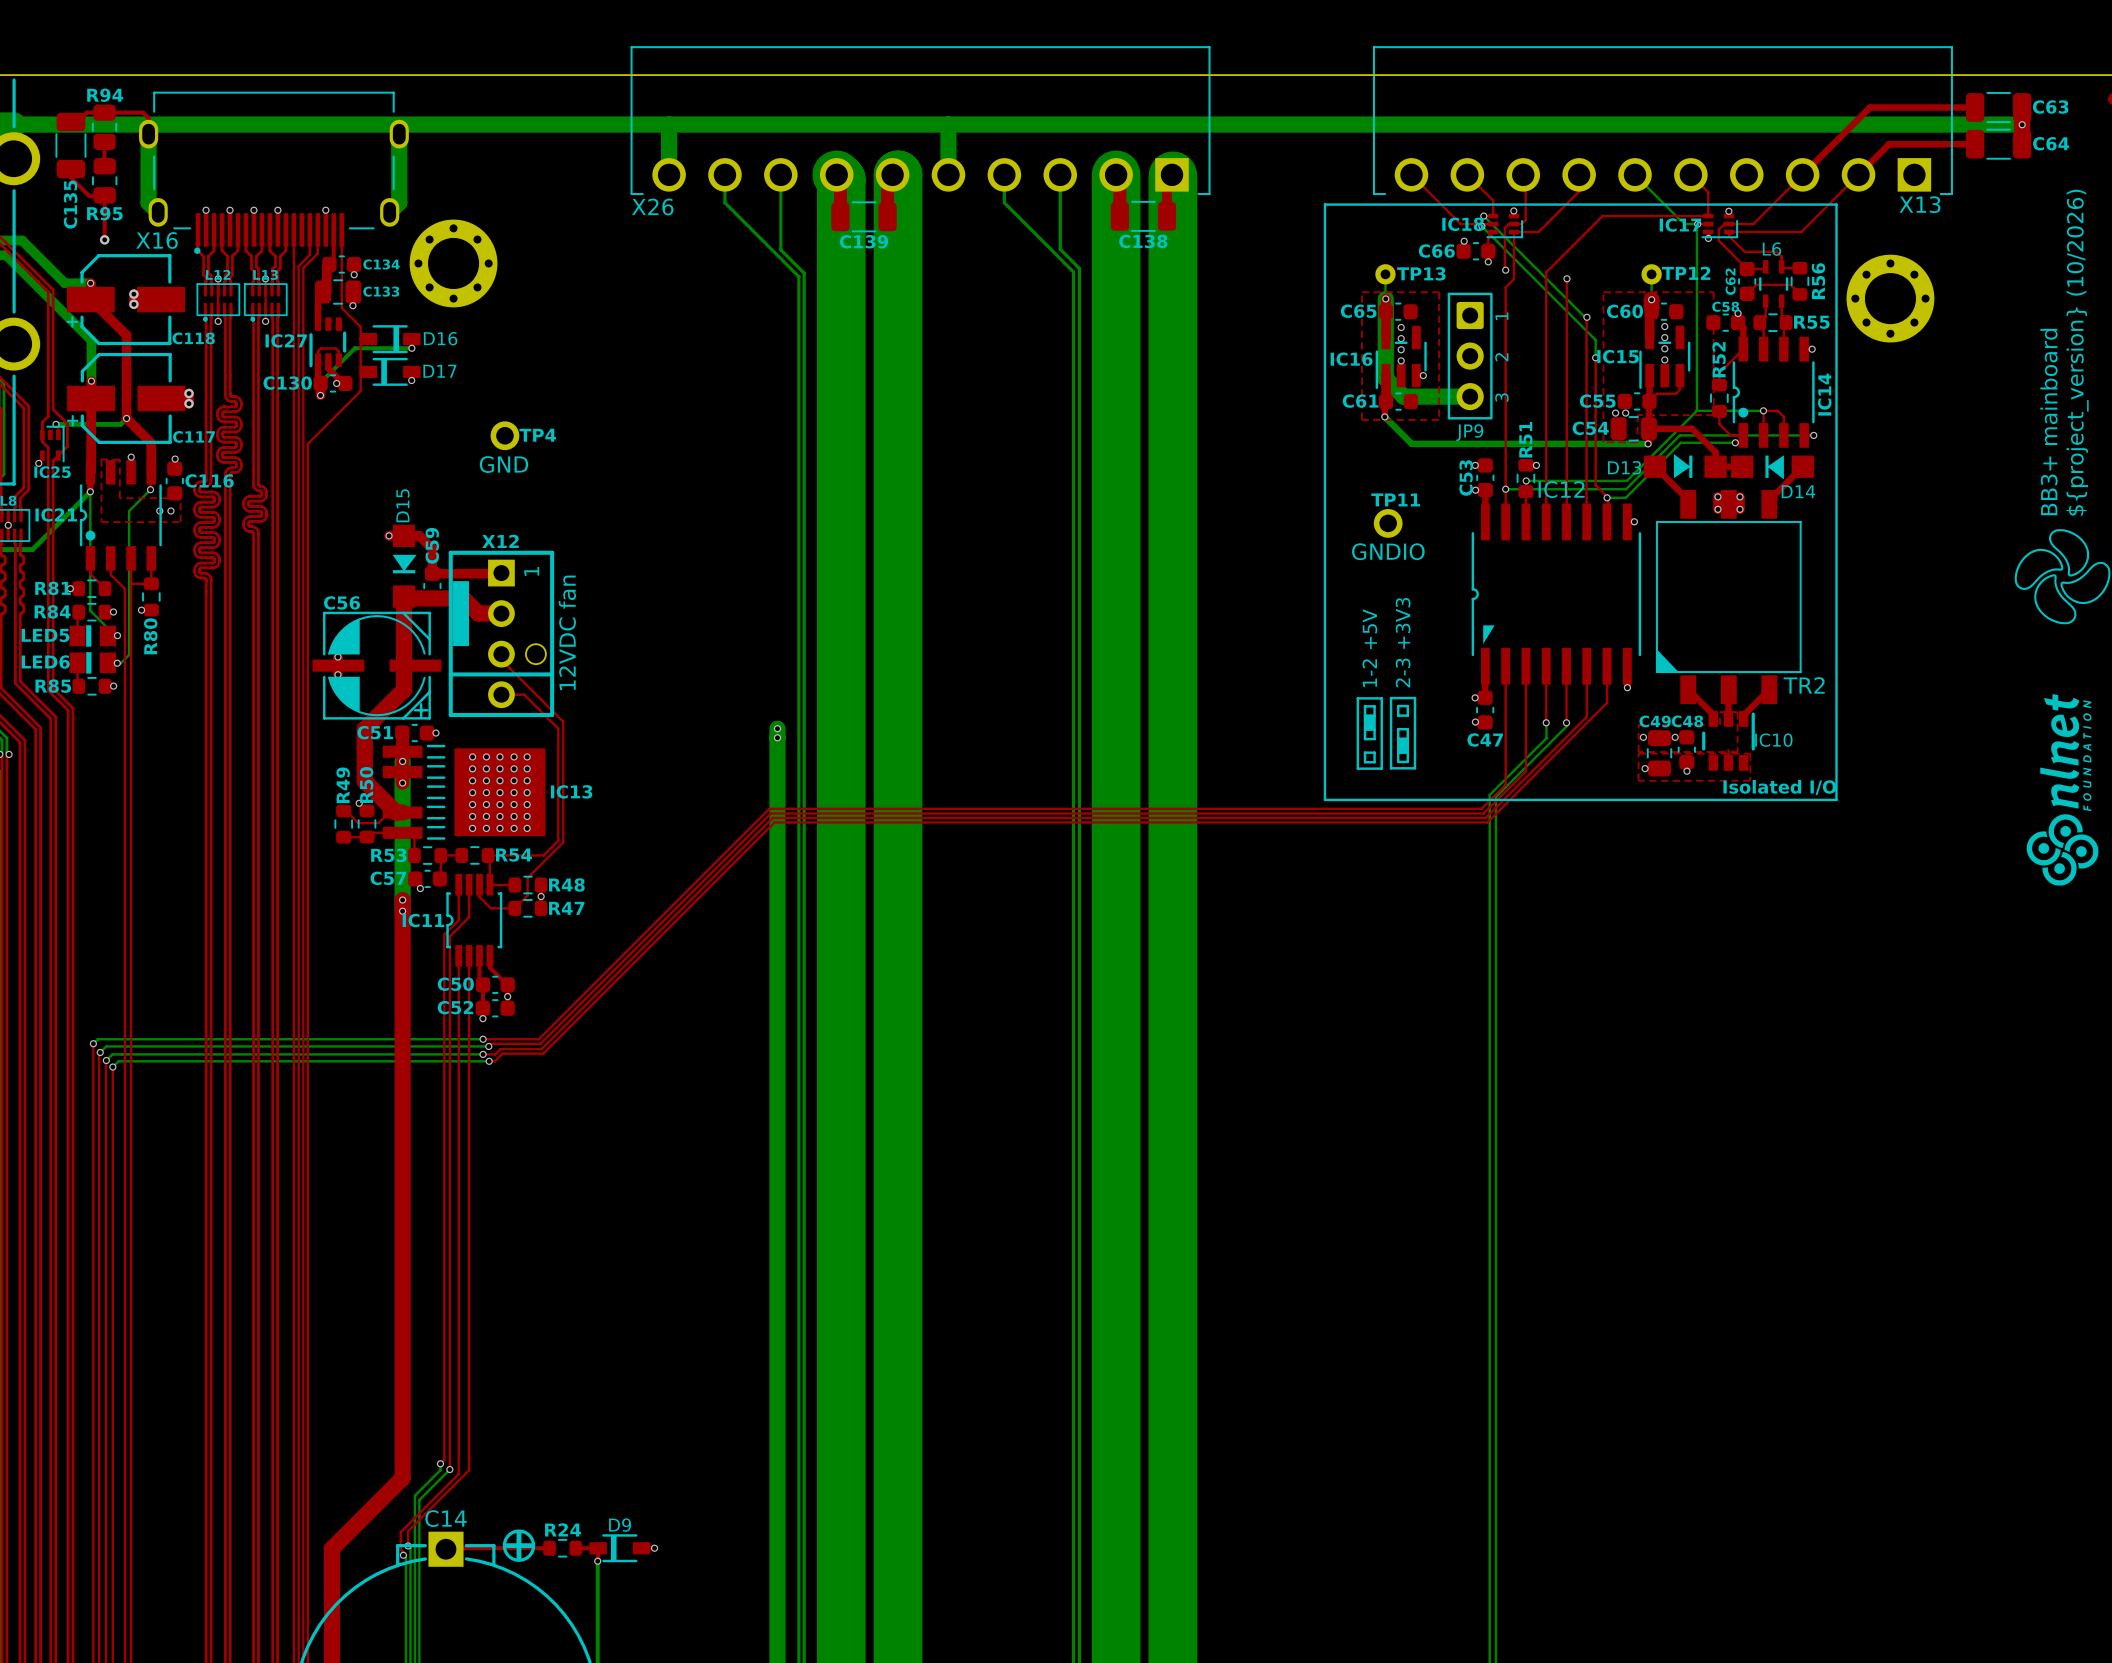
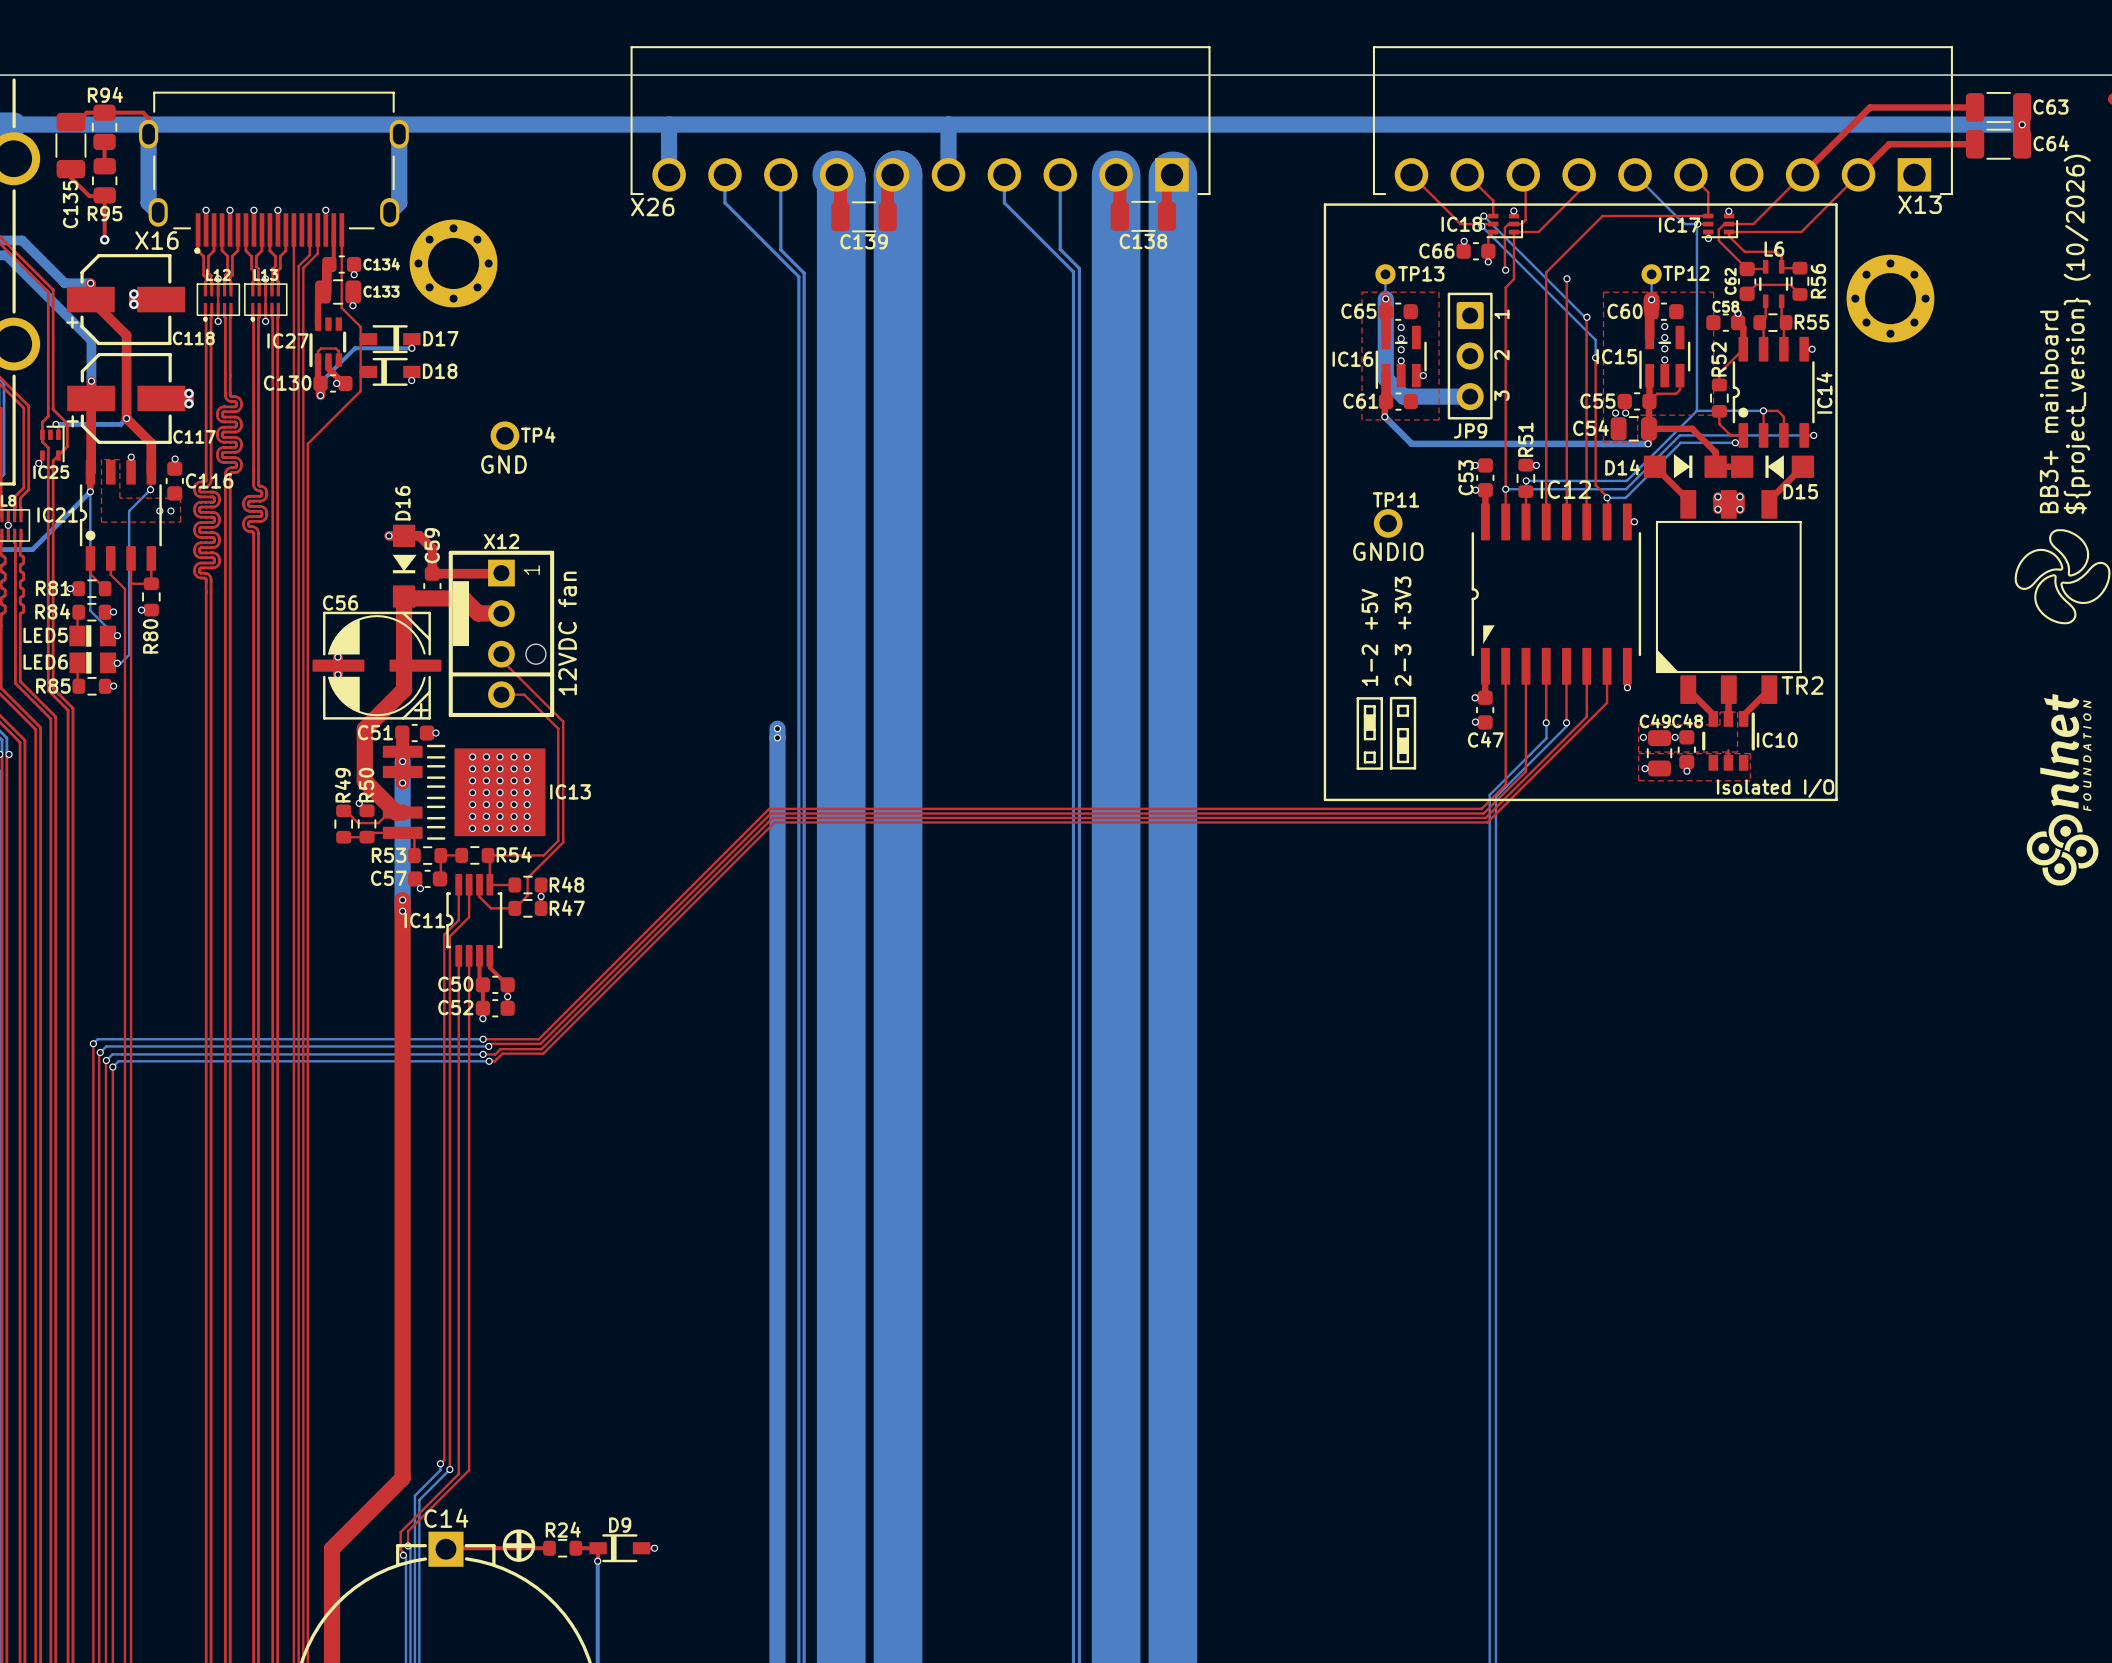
D16 name: D16 (440, 338) -> D17 (440, 338)
D17 name: D17 (439, 371) -> D18 (440, 371)
D13 name: D13 (1624, 467) -> D14 (1622, 467)
D14 name: D14 (1798, 491) -> D15 (1800, 491)
D15 name: D15 (402, 505) -> D16 (402, 503)

